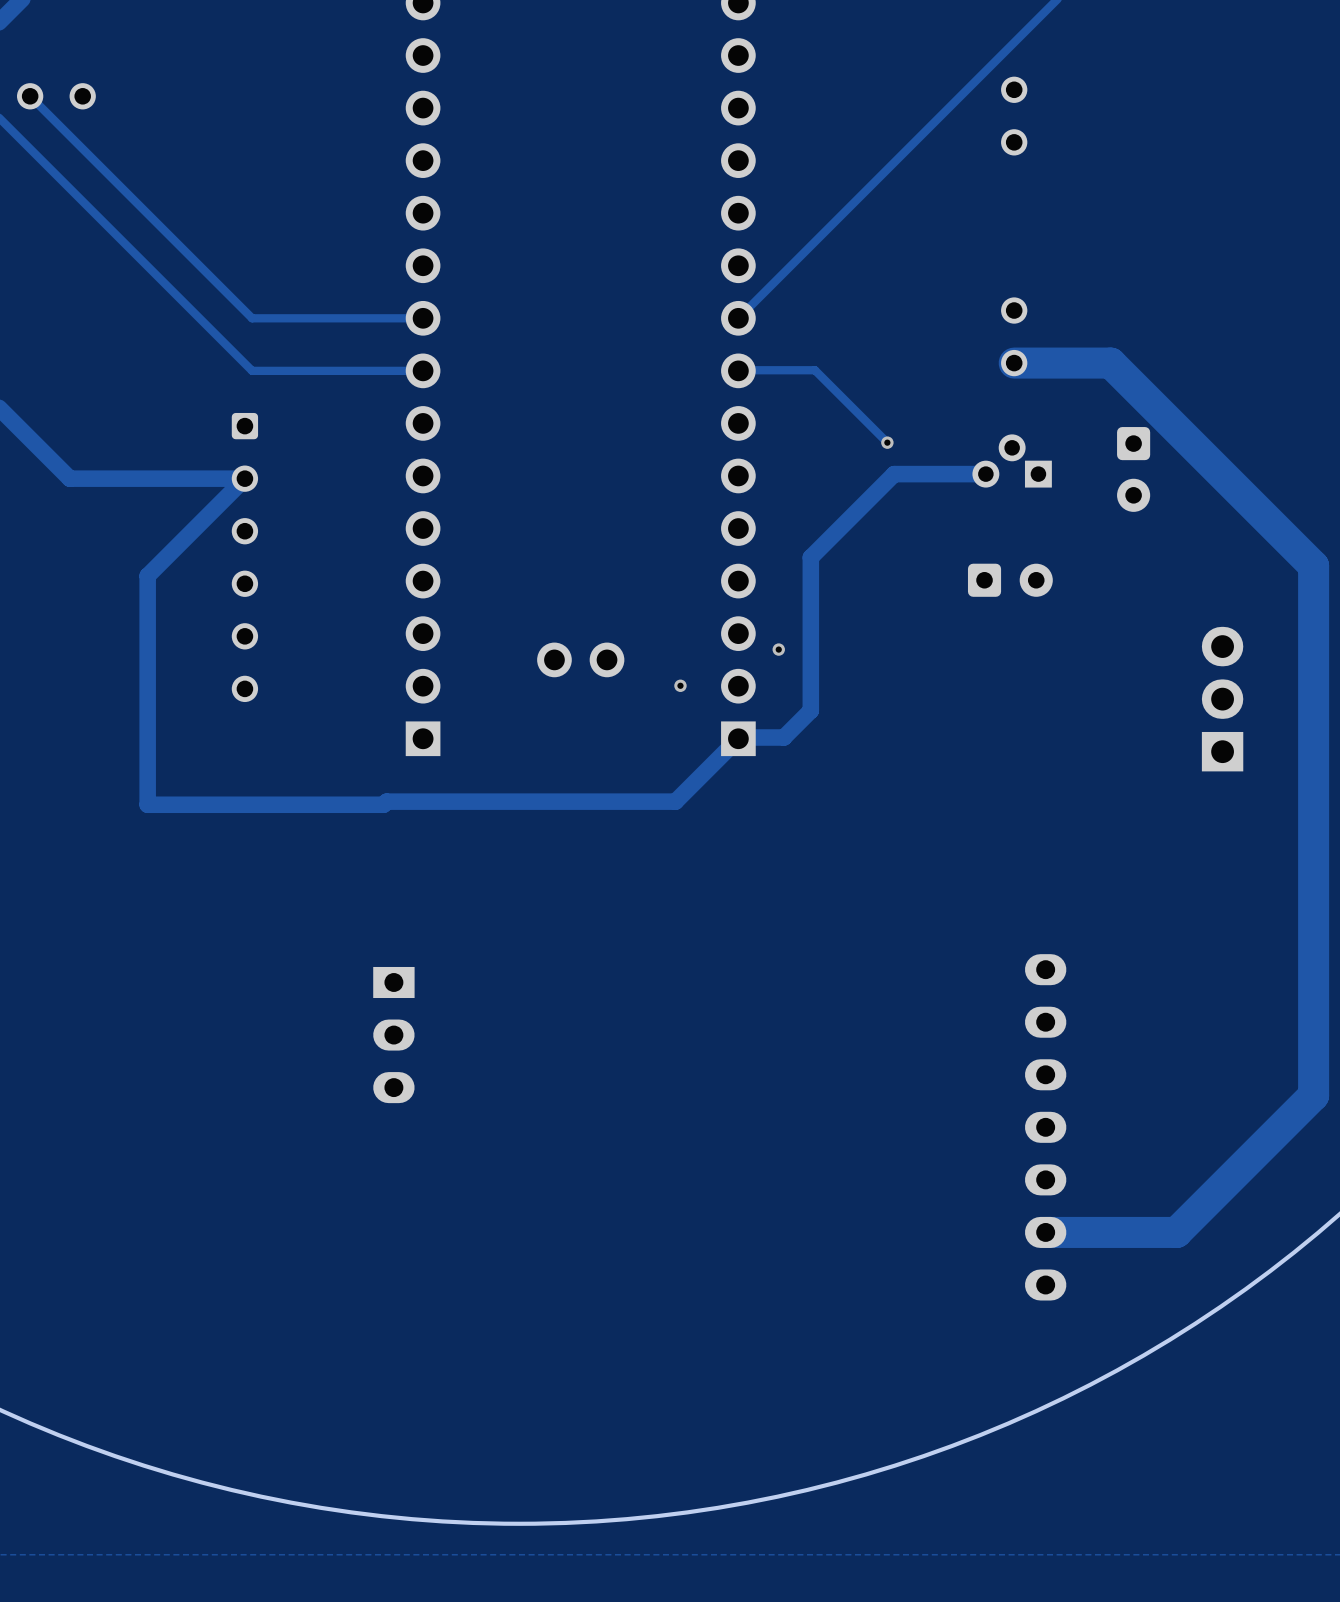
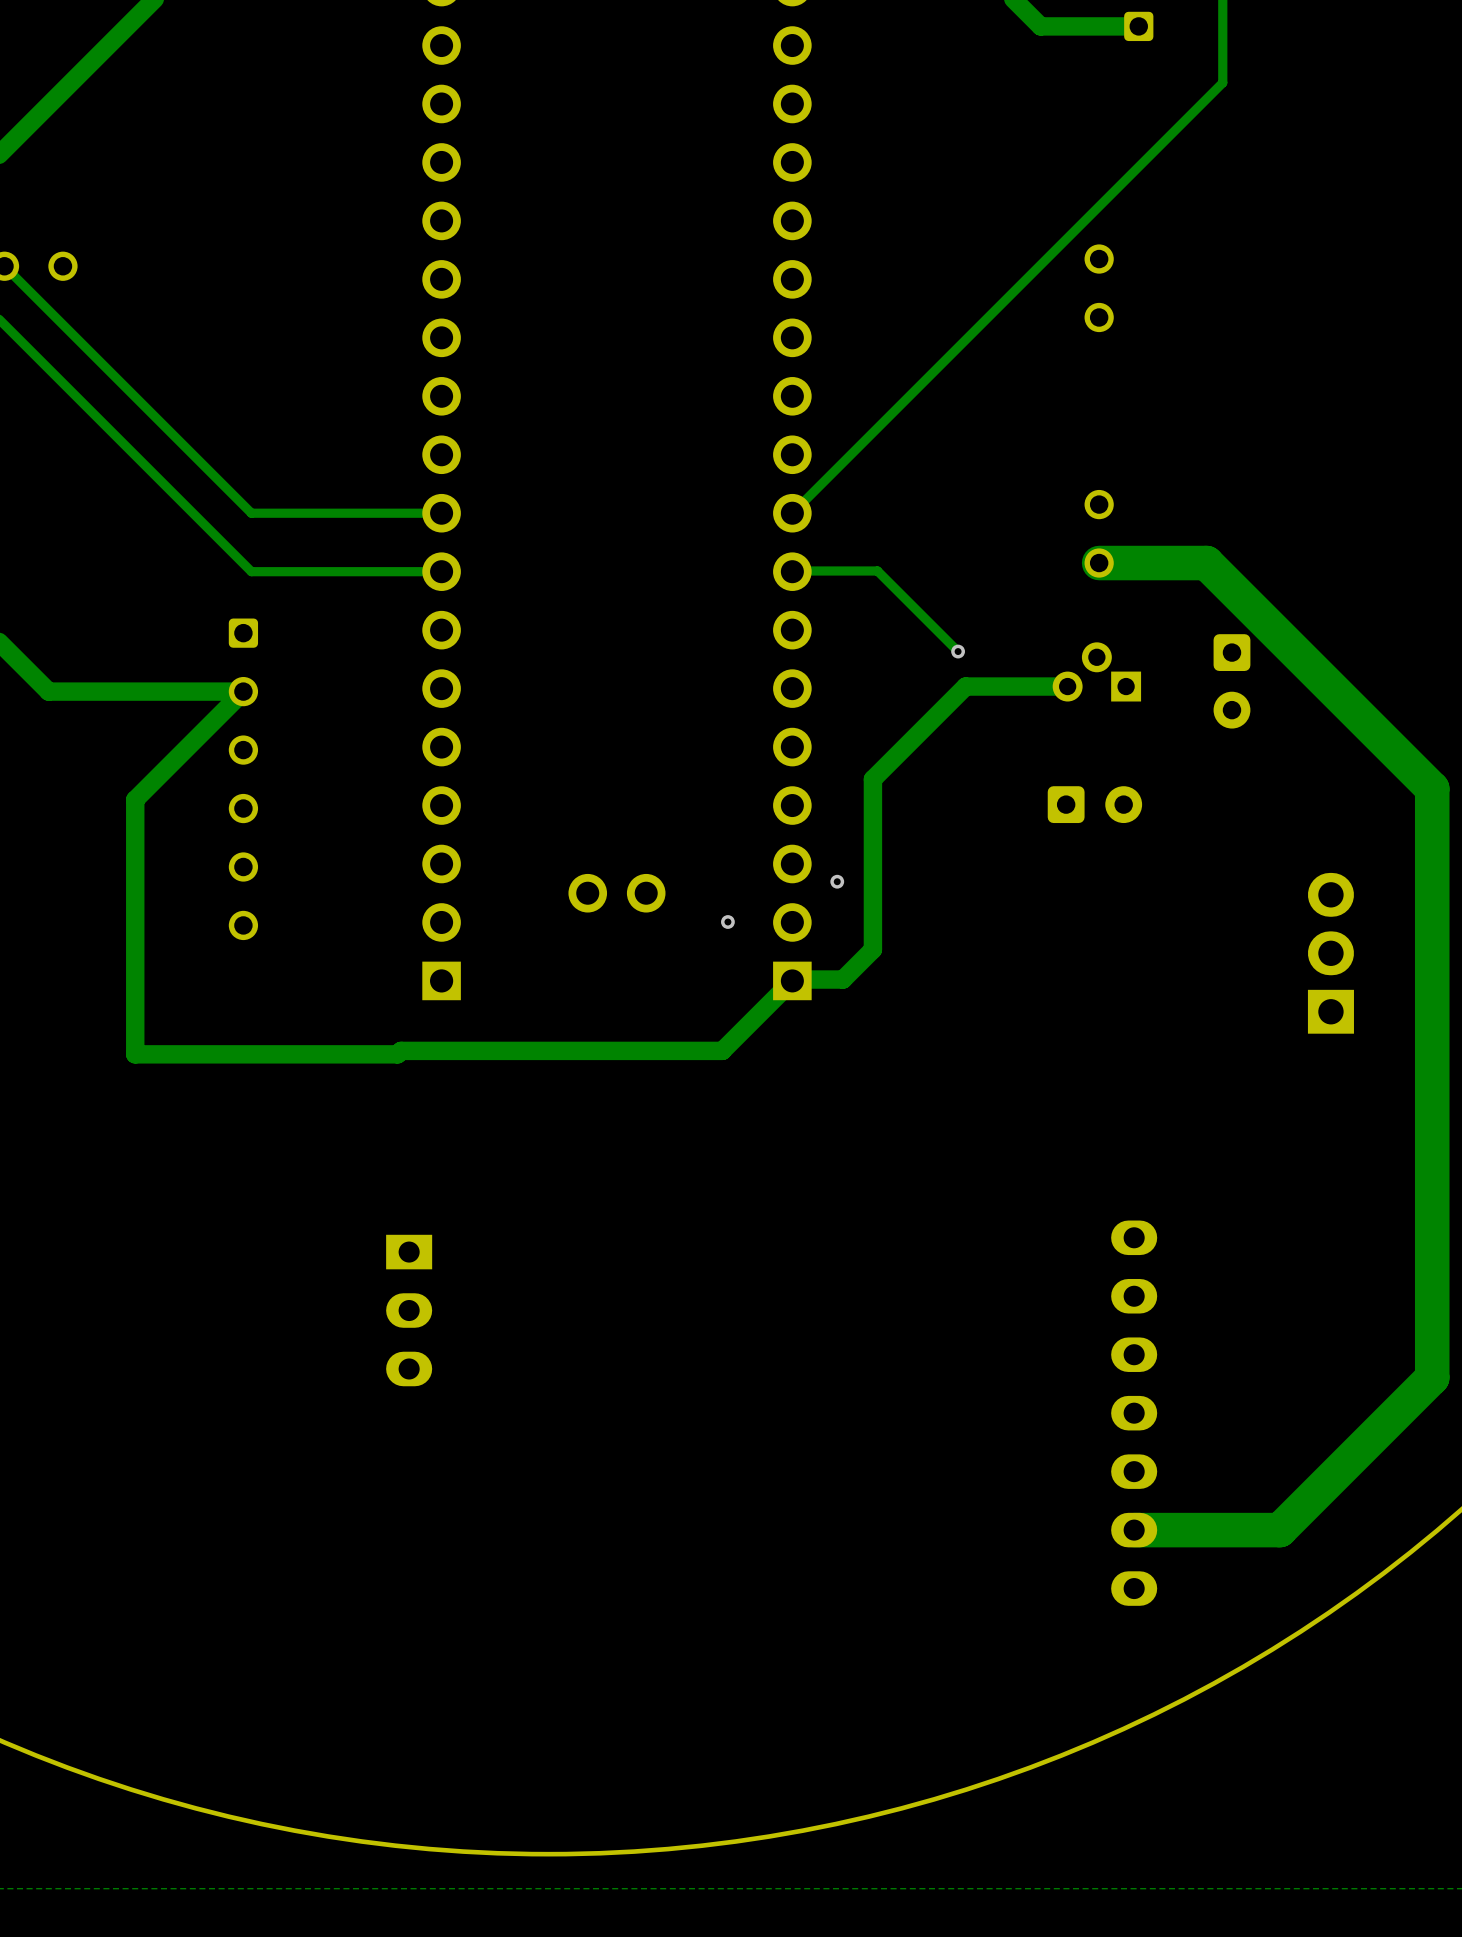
part position: (1222, 699) -> (1330, 953)

